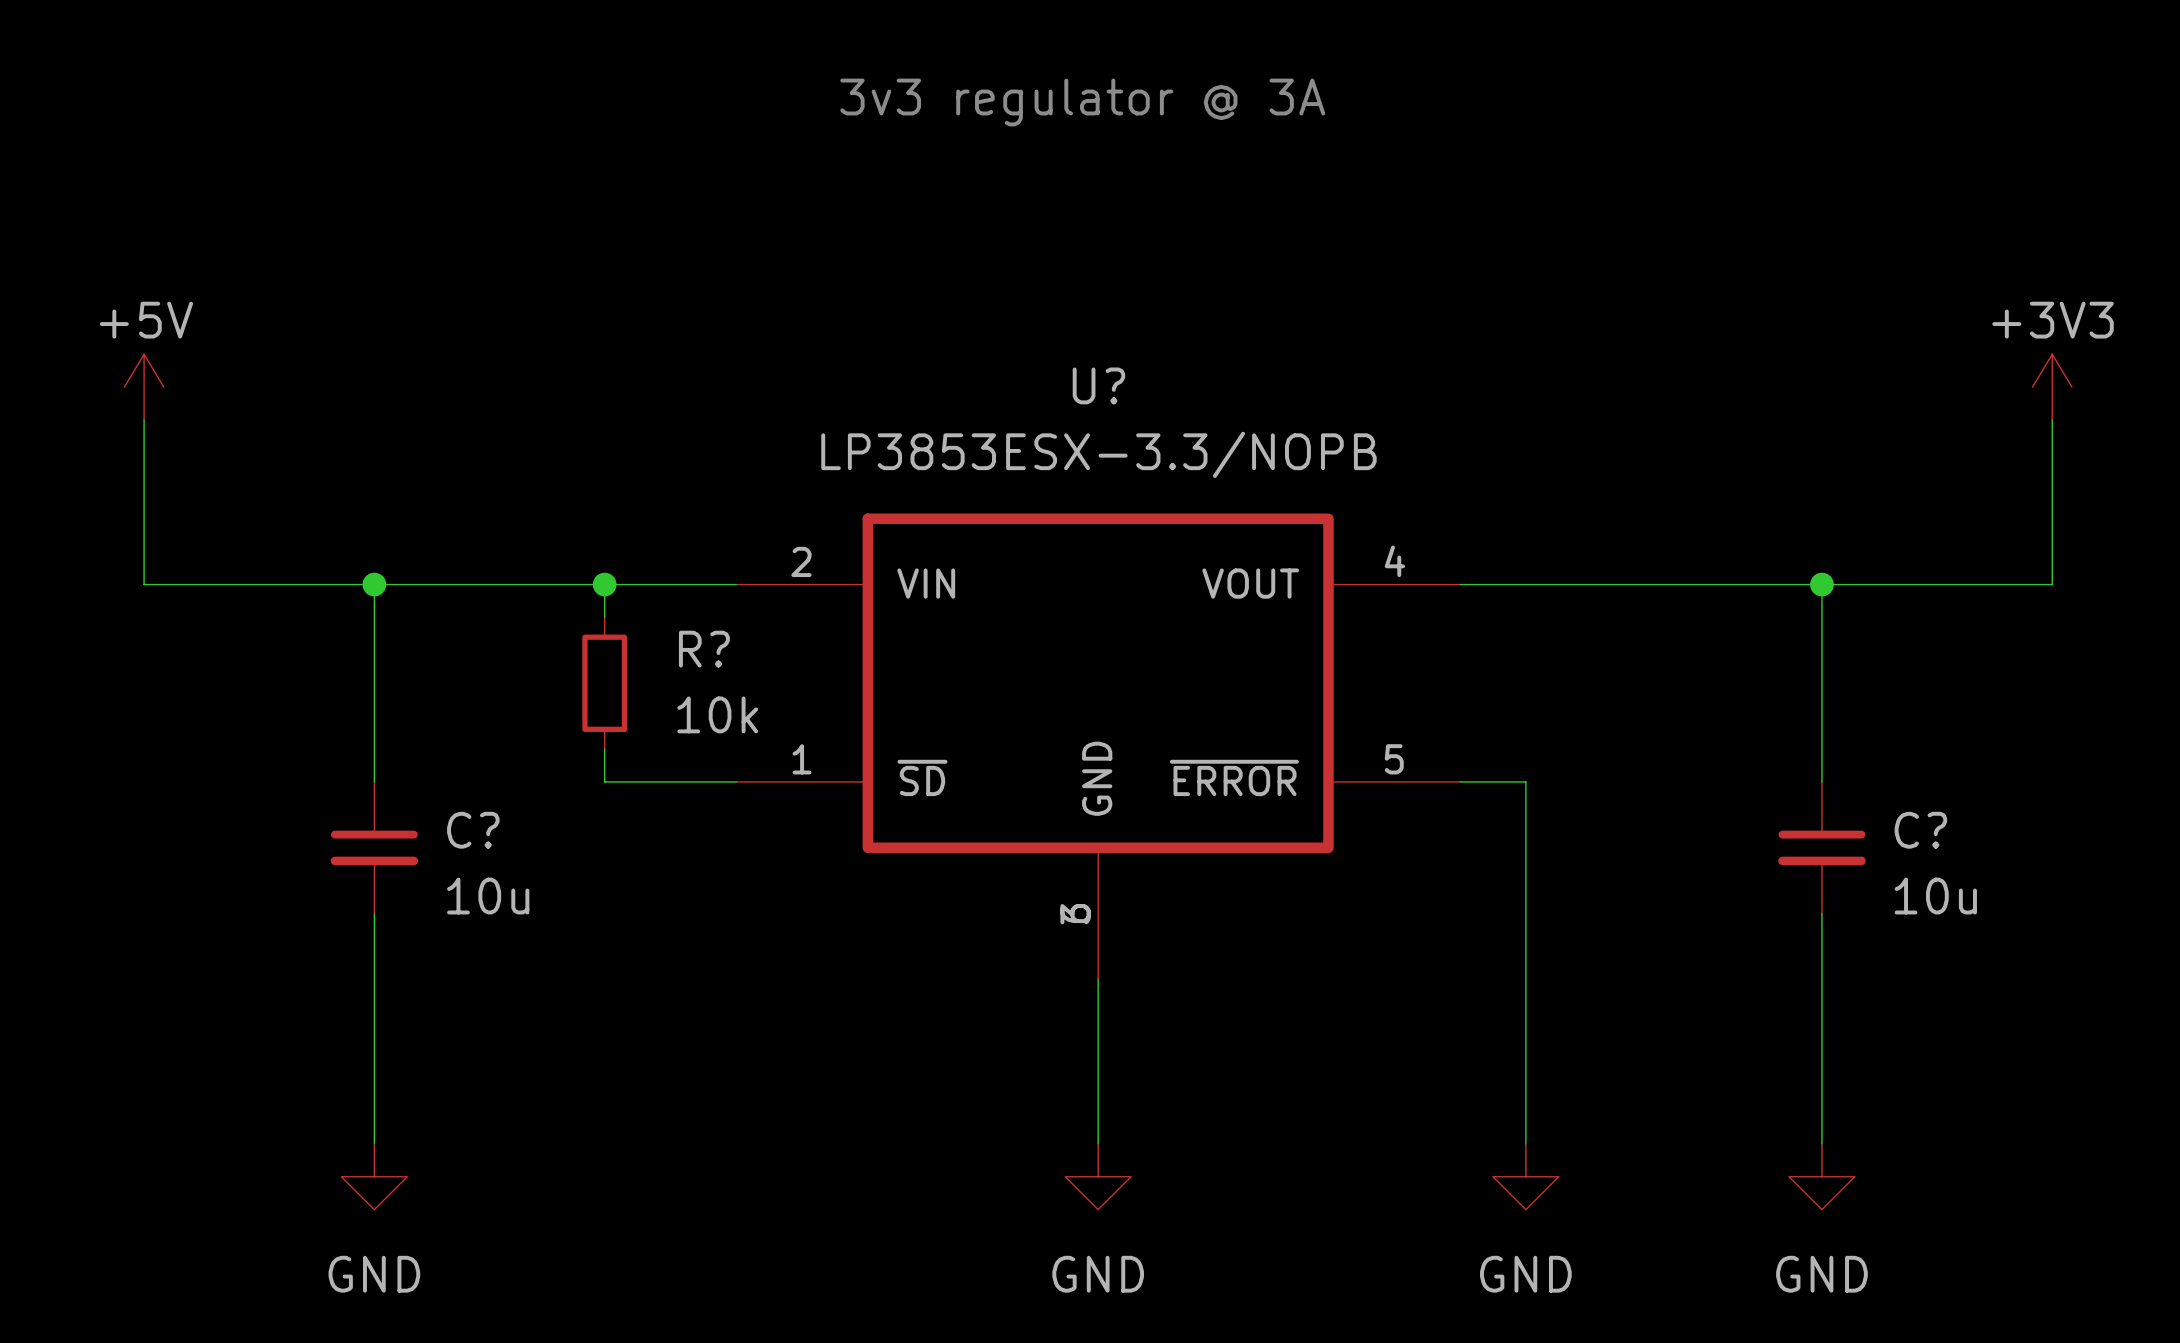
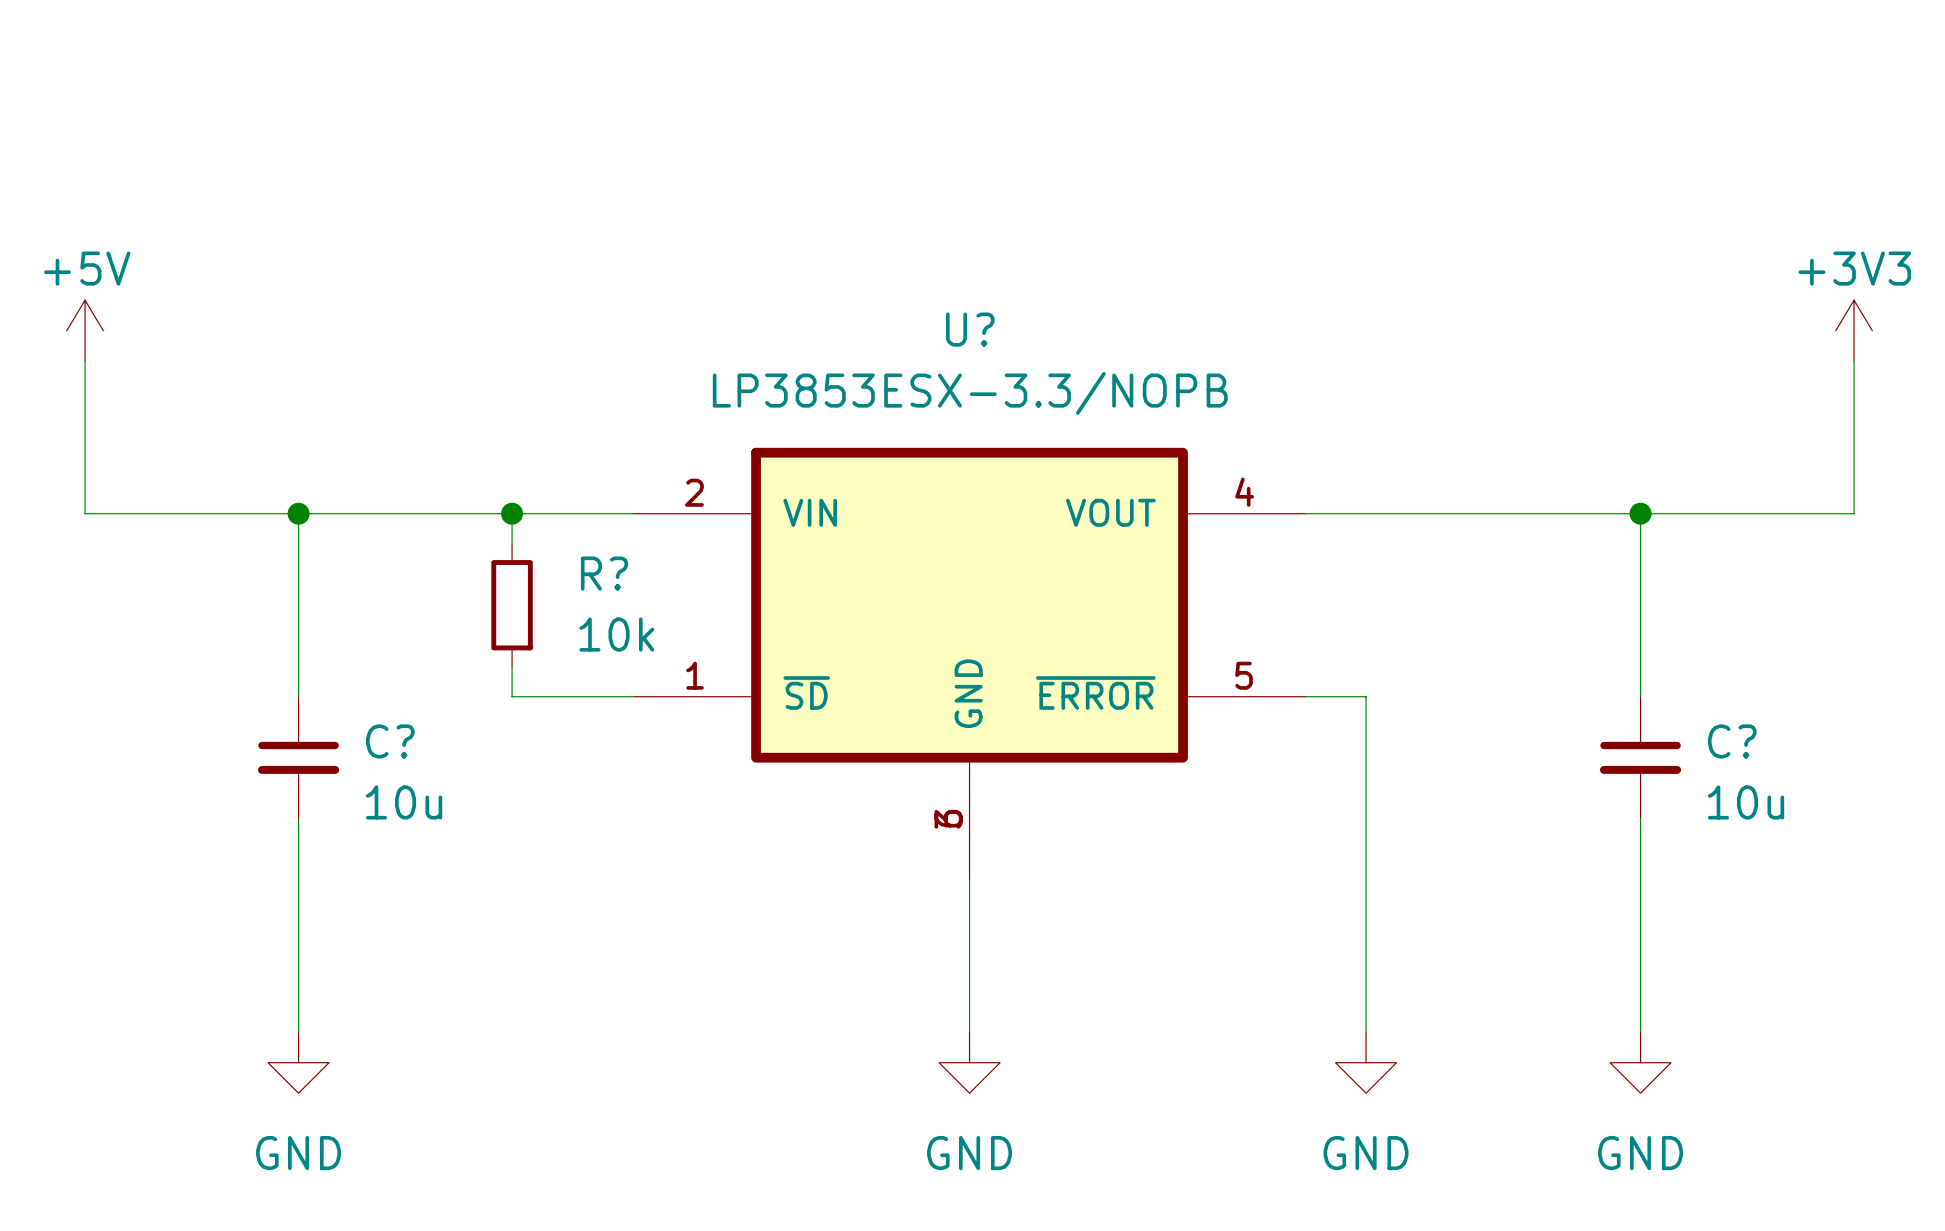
text: 3v3 regulator @ 3A (1082, 102) -> none

